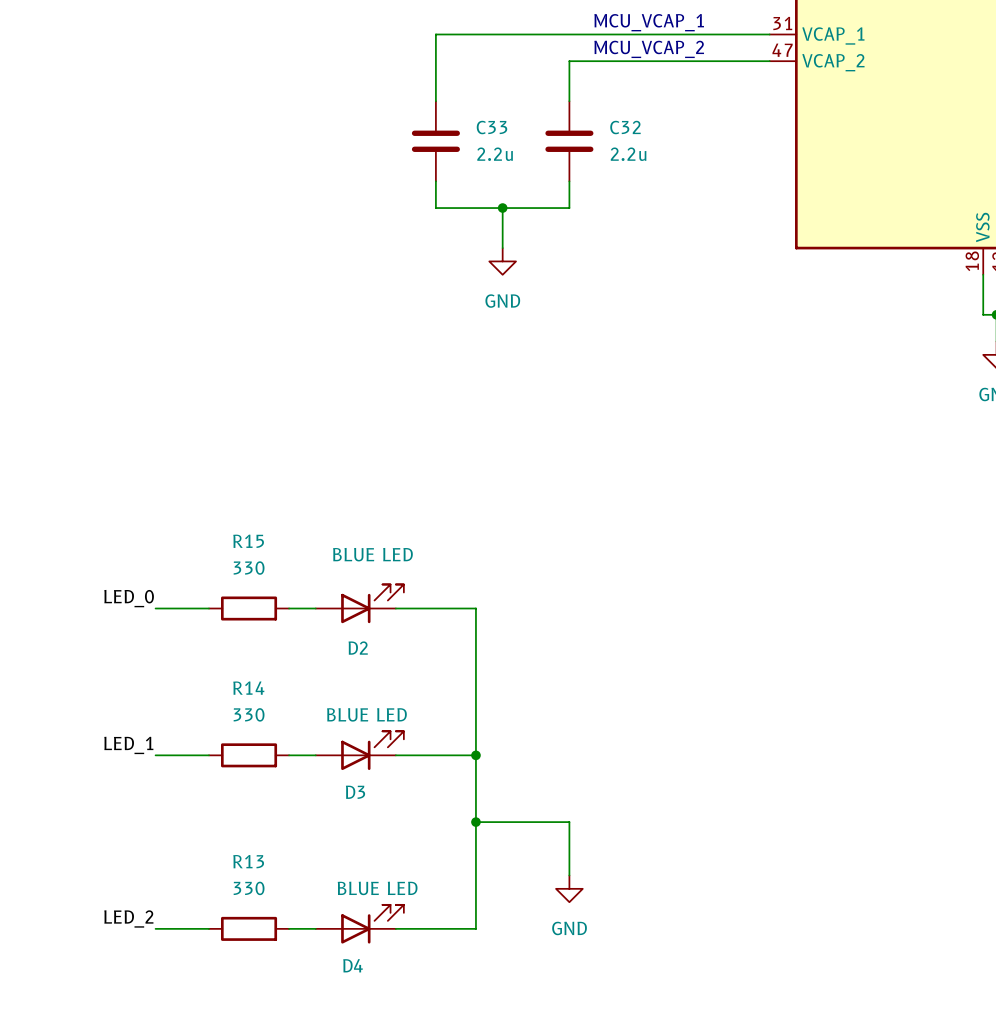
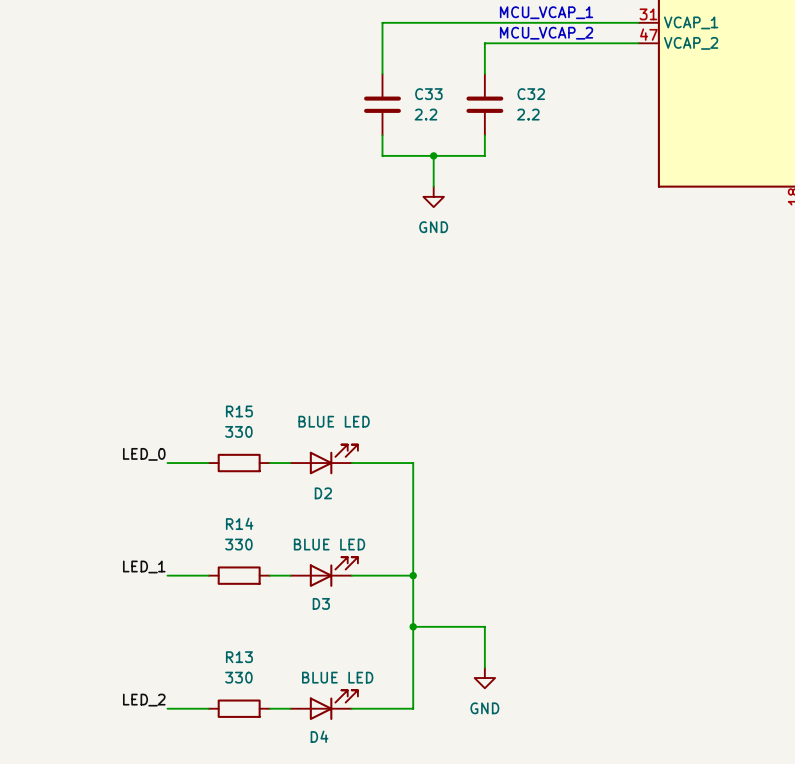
C33 value: 2.2u (495, 154) -> 2.2 (425, 114)
C32 value: 2.2u (628, 154) -> 2.2 (528, 114)

